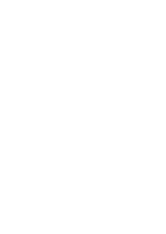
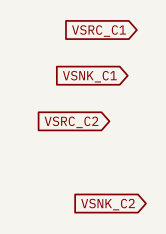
global label: none -> VSRC_C1 (99, 31)
global label: none -> VSNK_C1 (89, 76)
global label: none -> VSRC_C2 (71, 122)
global label: none -> VSNK_C2 (108, 204)

